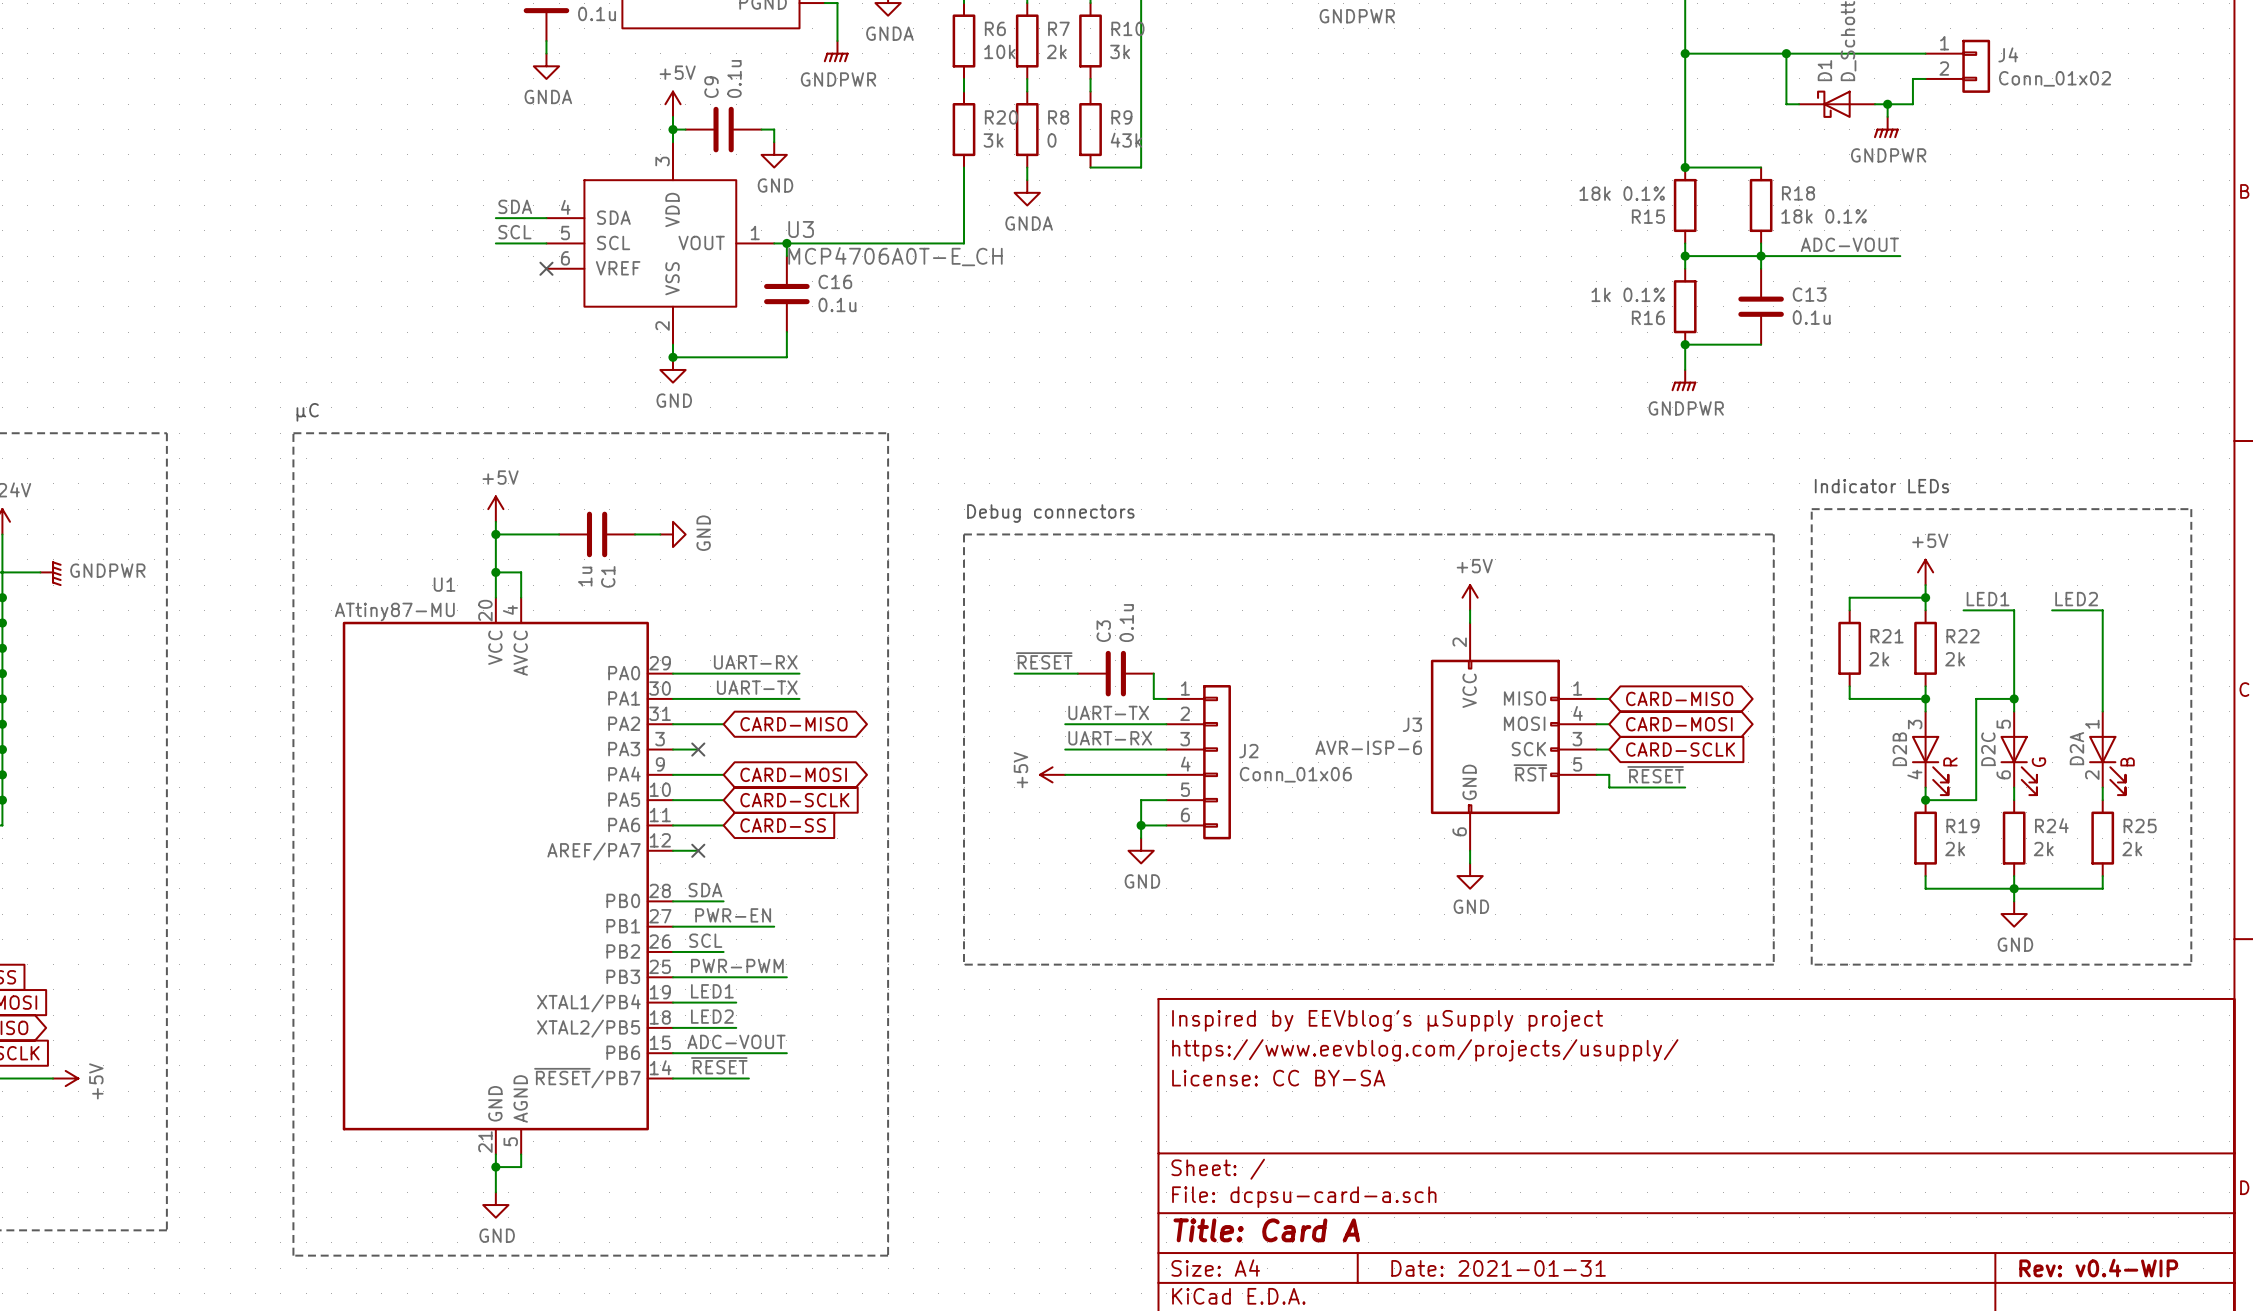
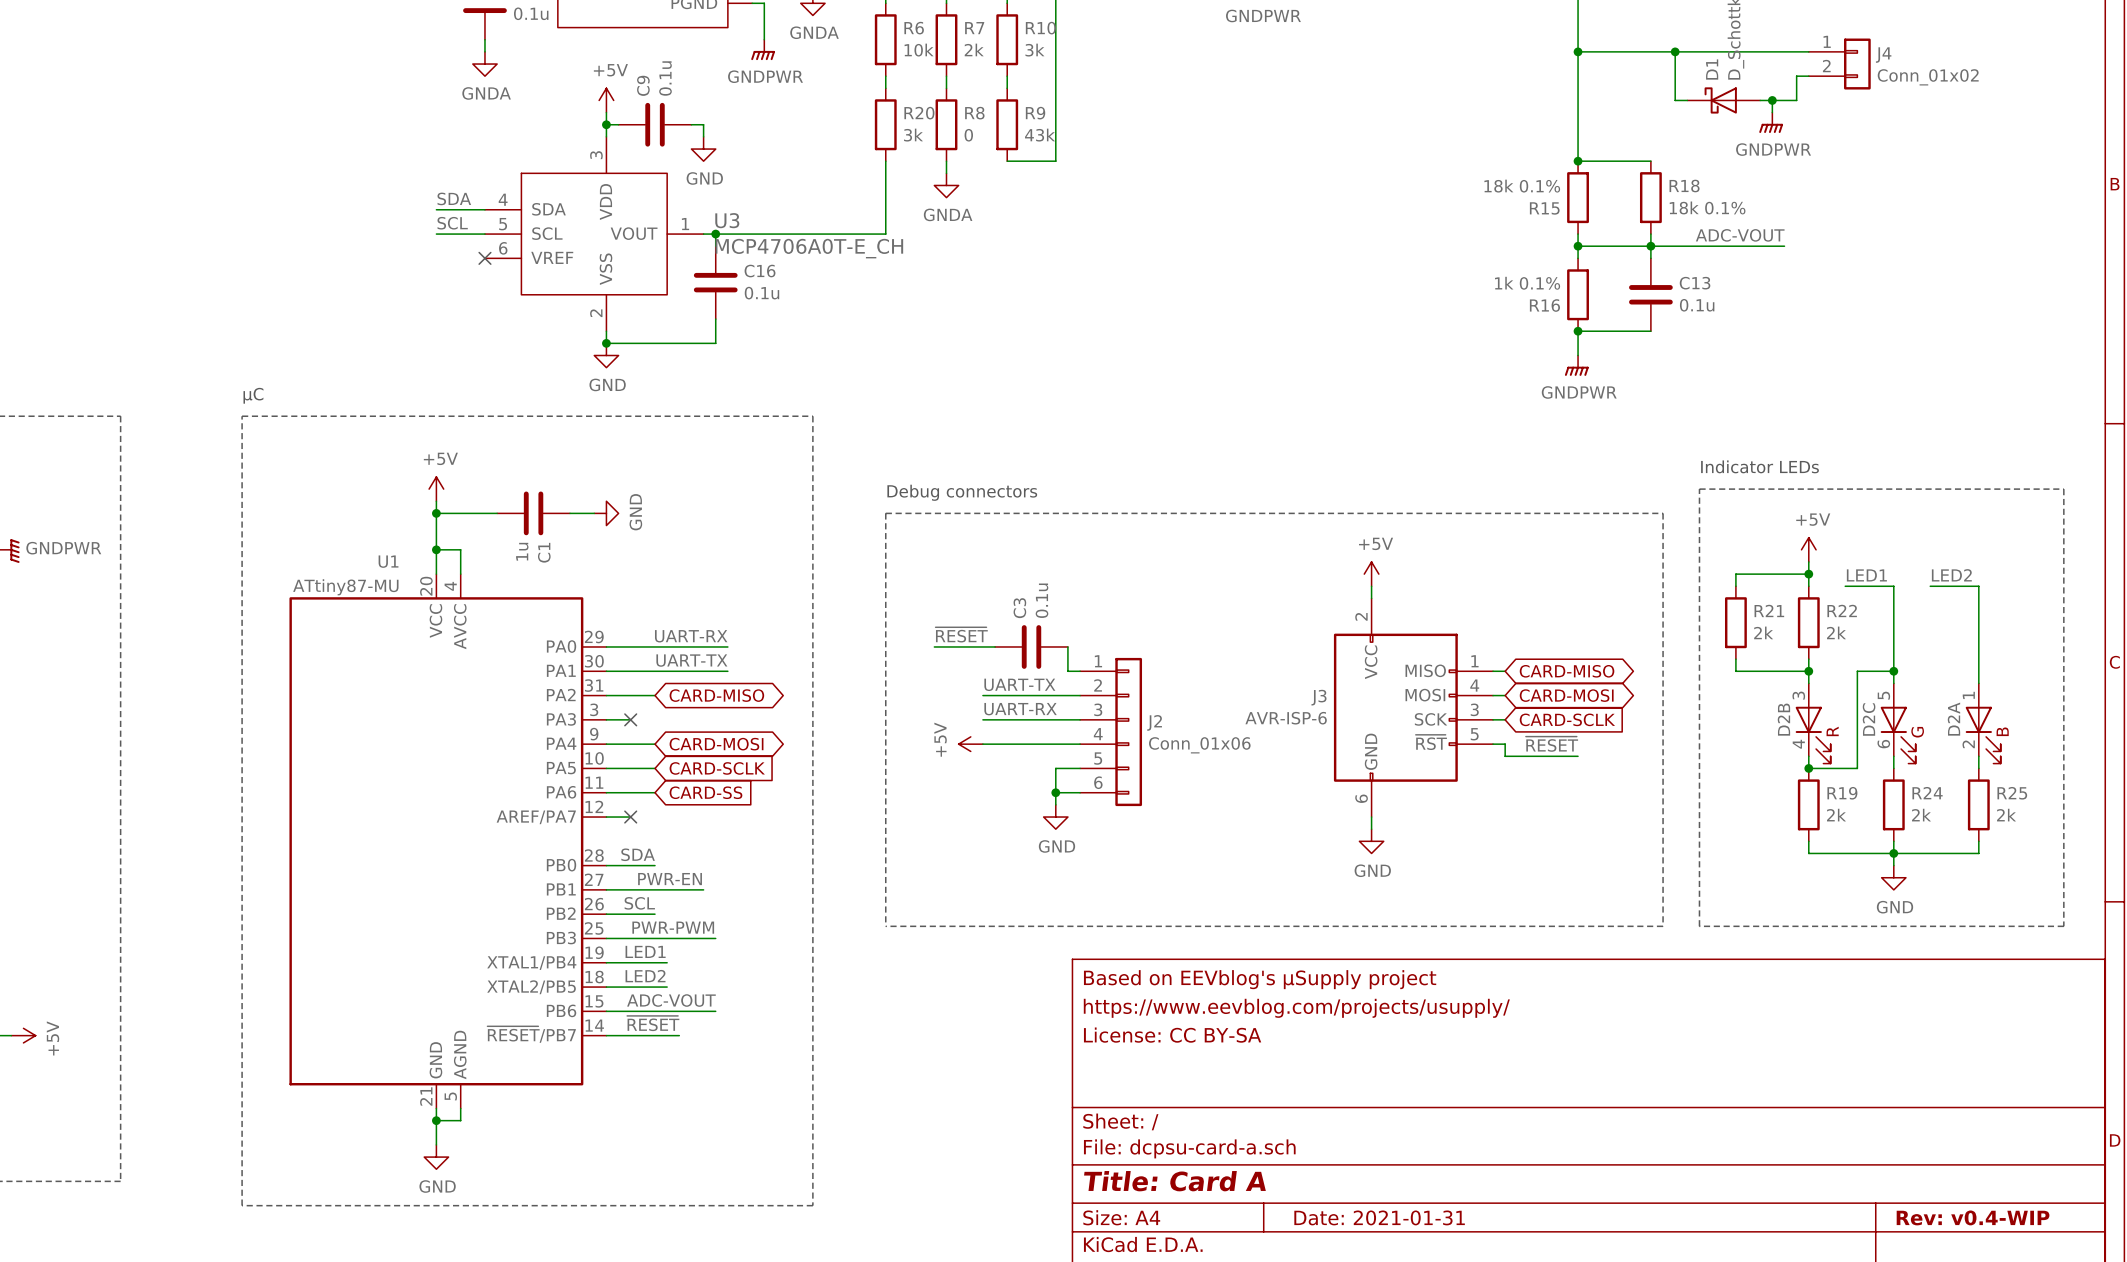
title block: Inspired by EEVblog's µSupply project (1387, 1020) -> Based on EEVblog's µSupply project (1260, 979)

